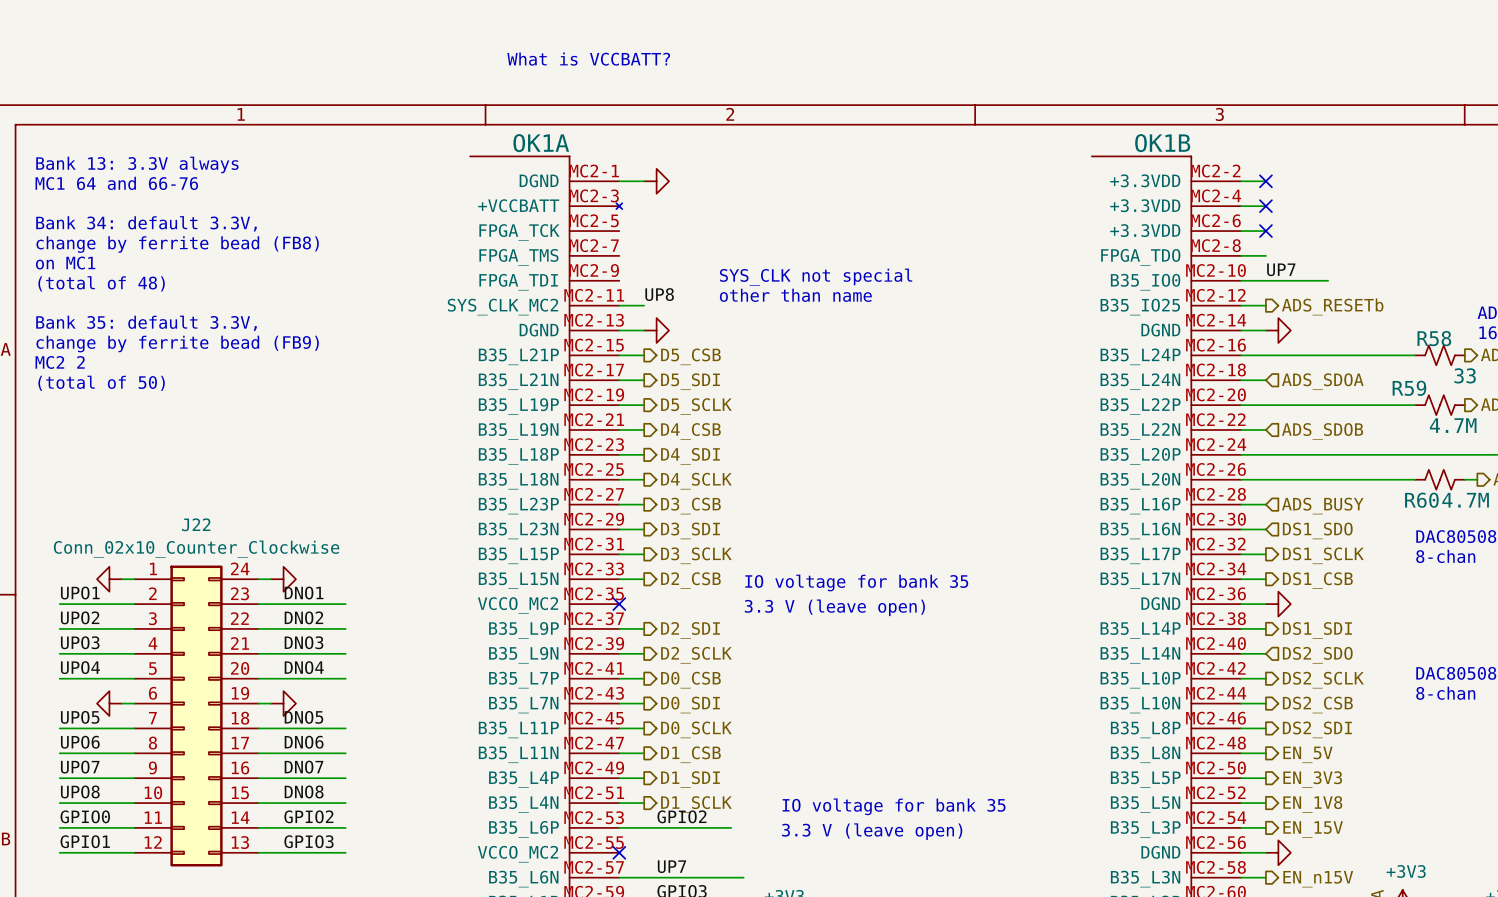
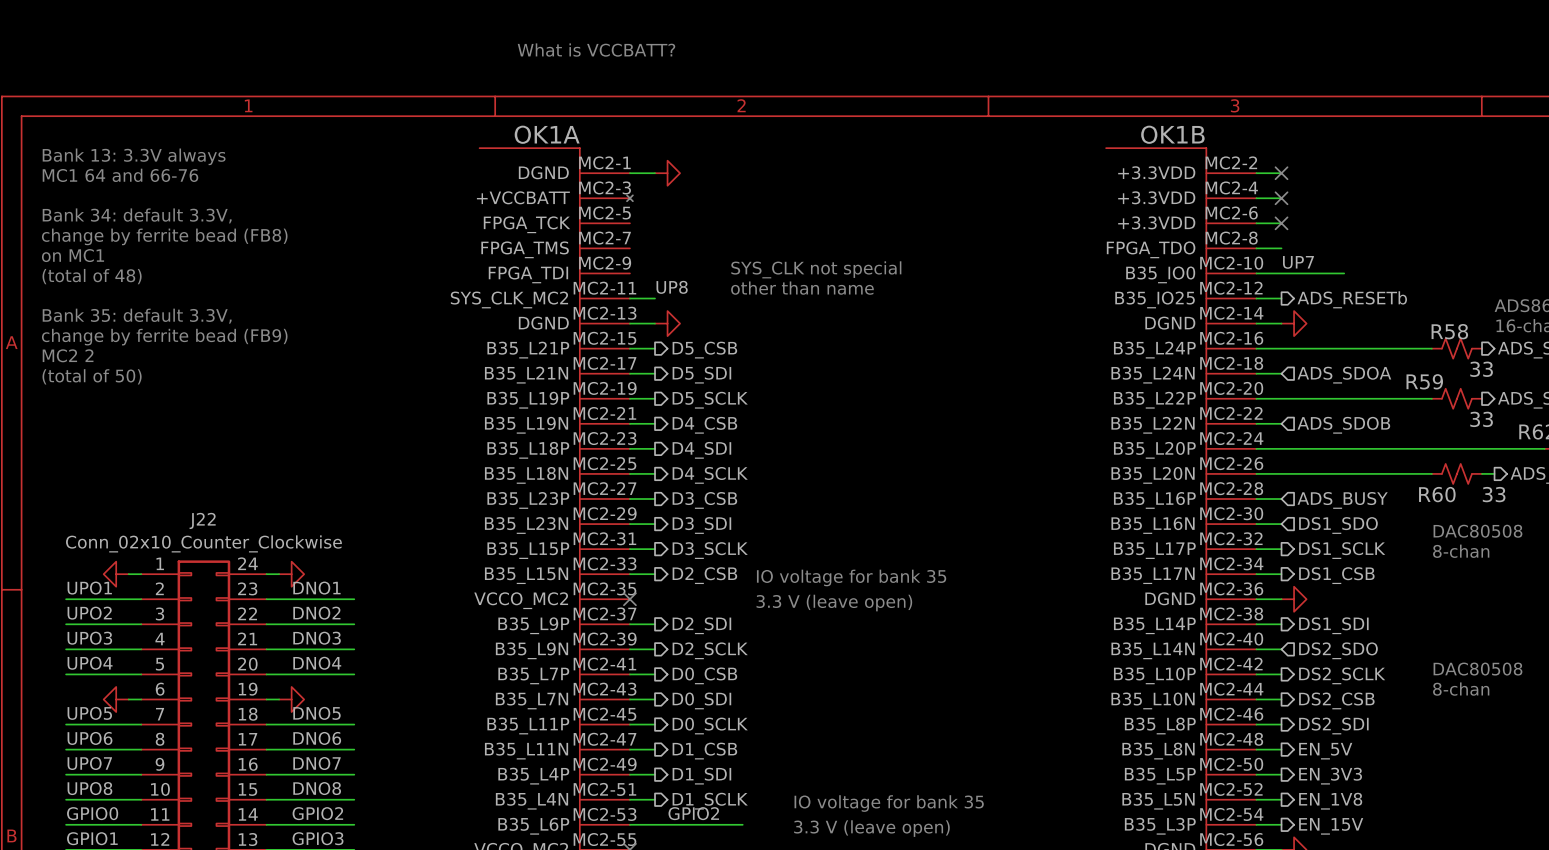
R59 value: 4.7M (1453, 425) -> 33 (1481, 419)
R60 value: 4.7M (1465, 500) -> 33 (1494, 494)

